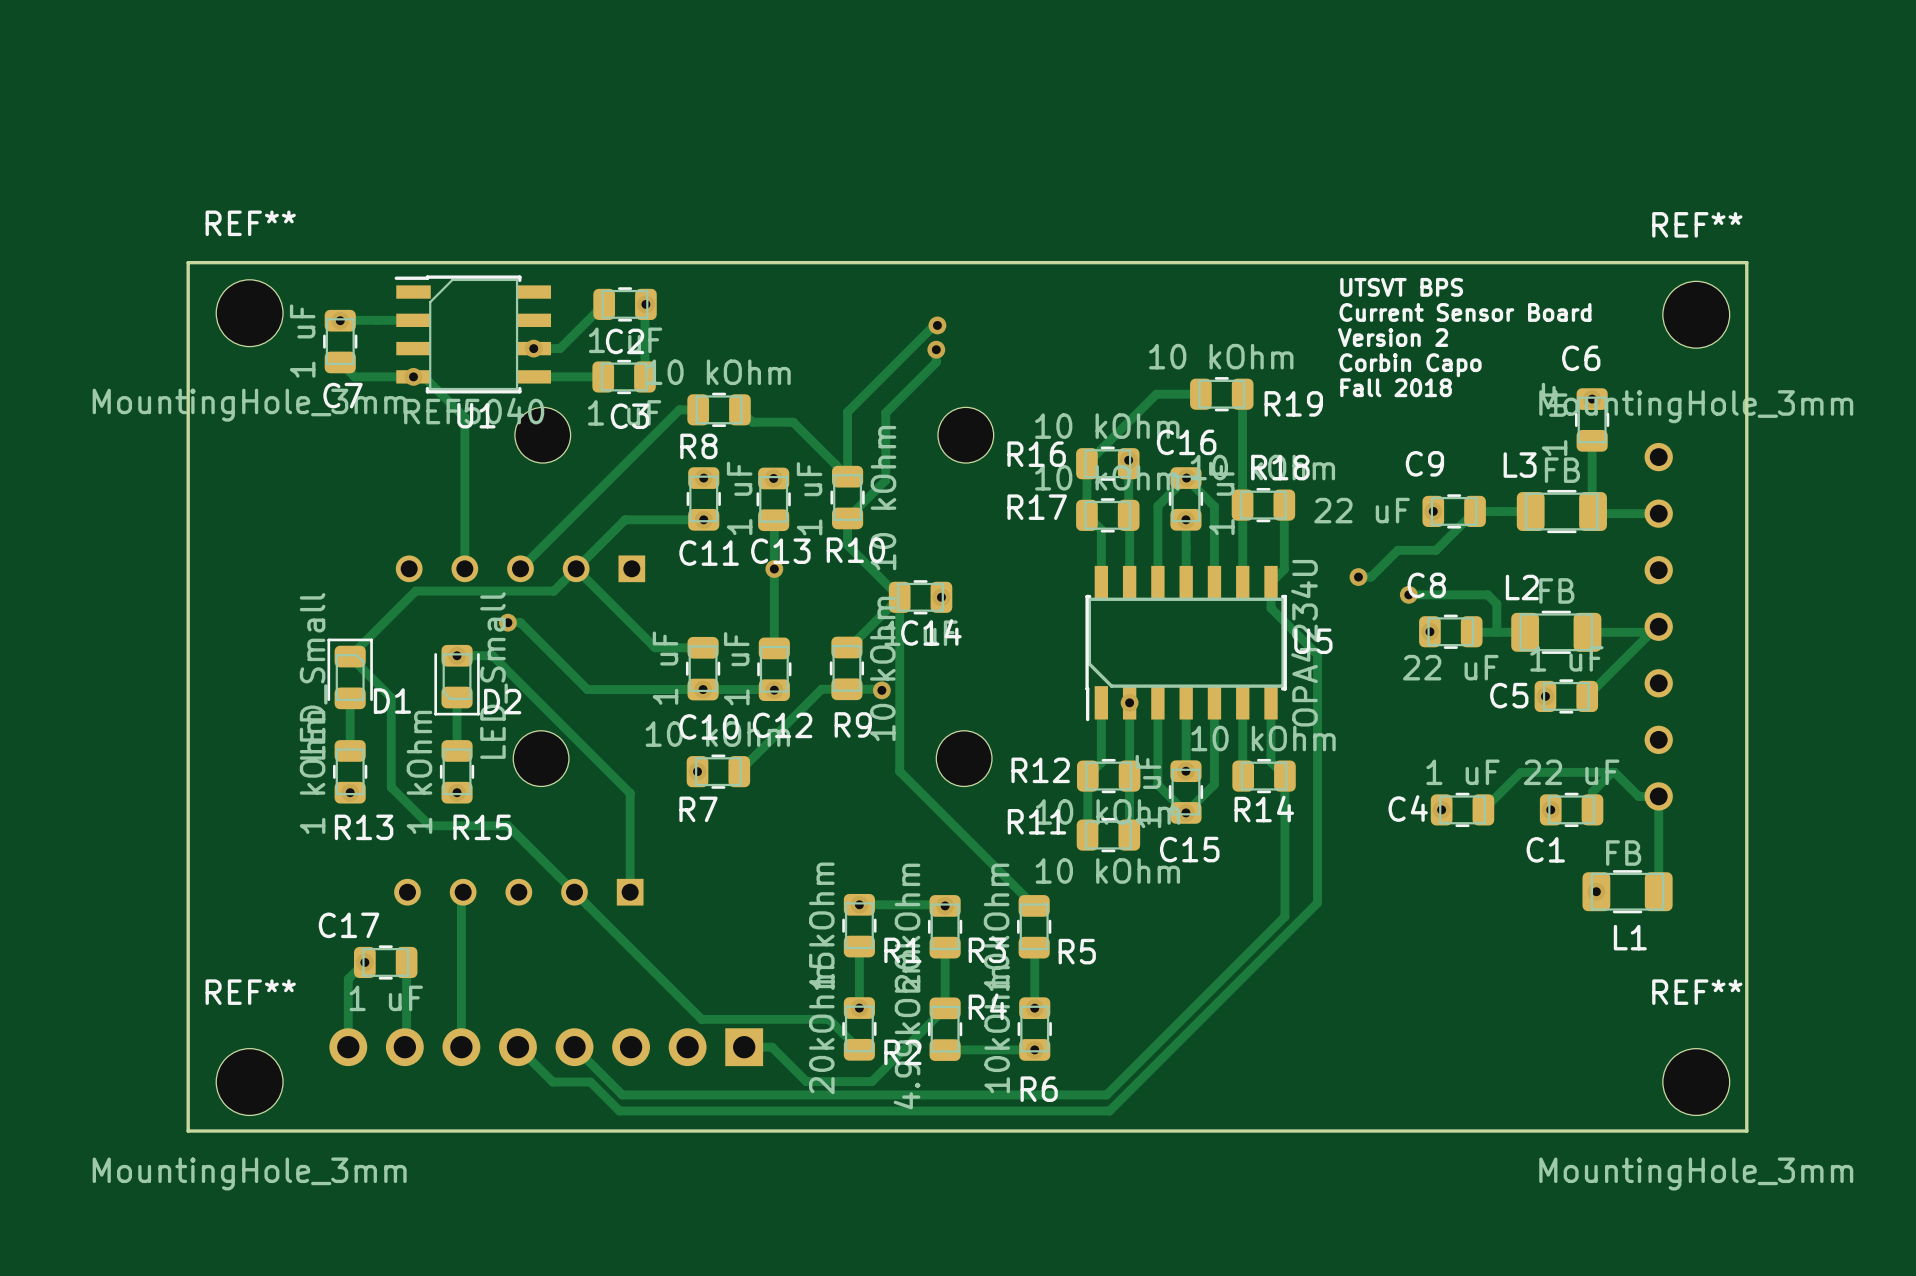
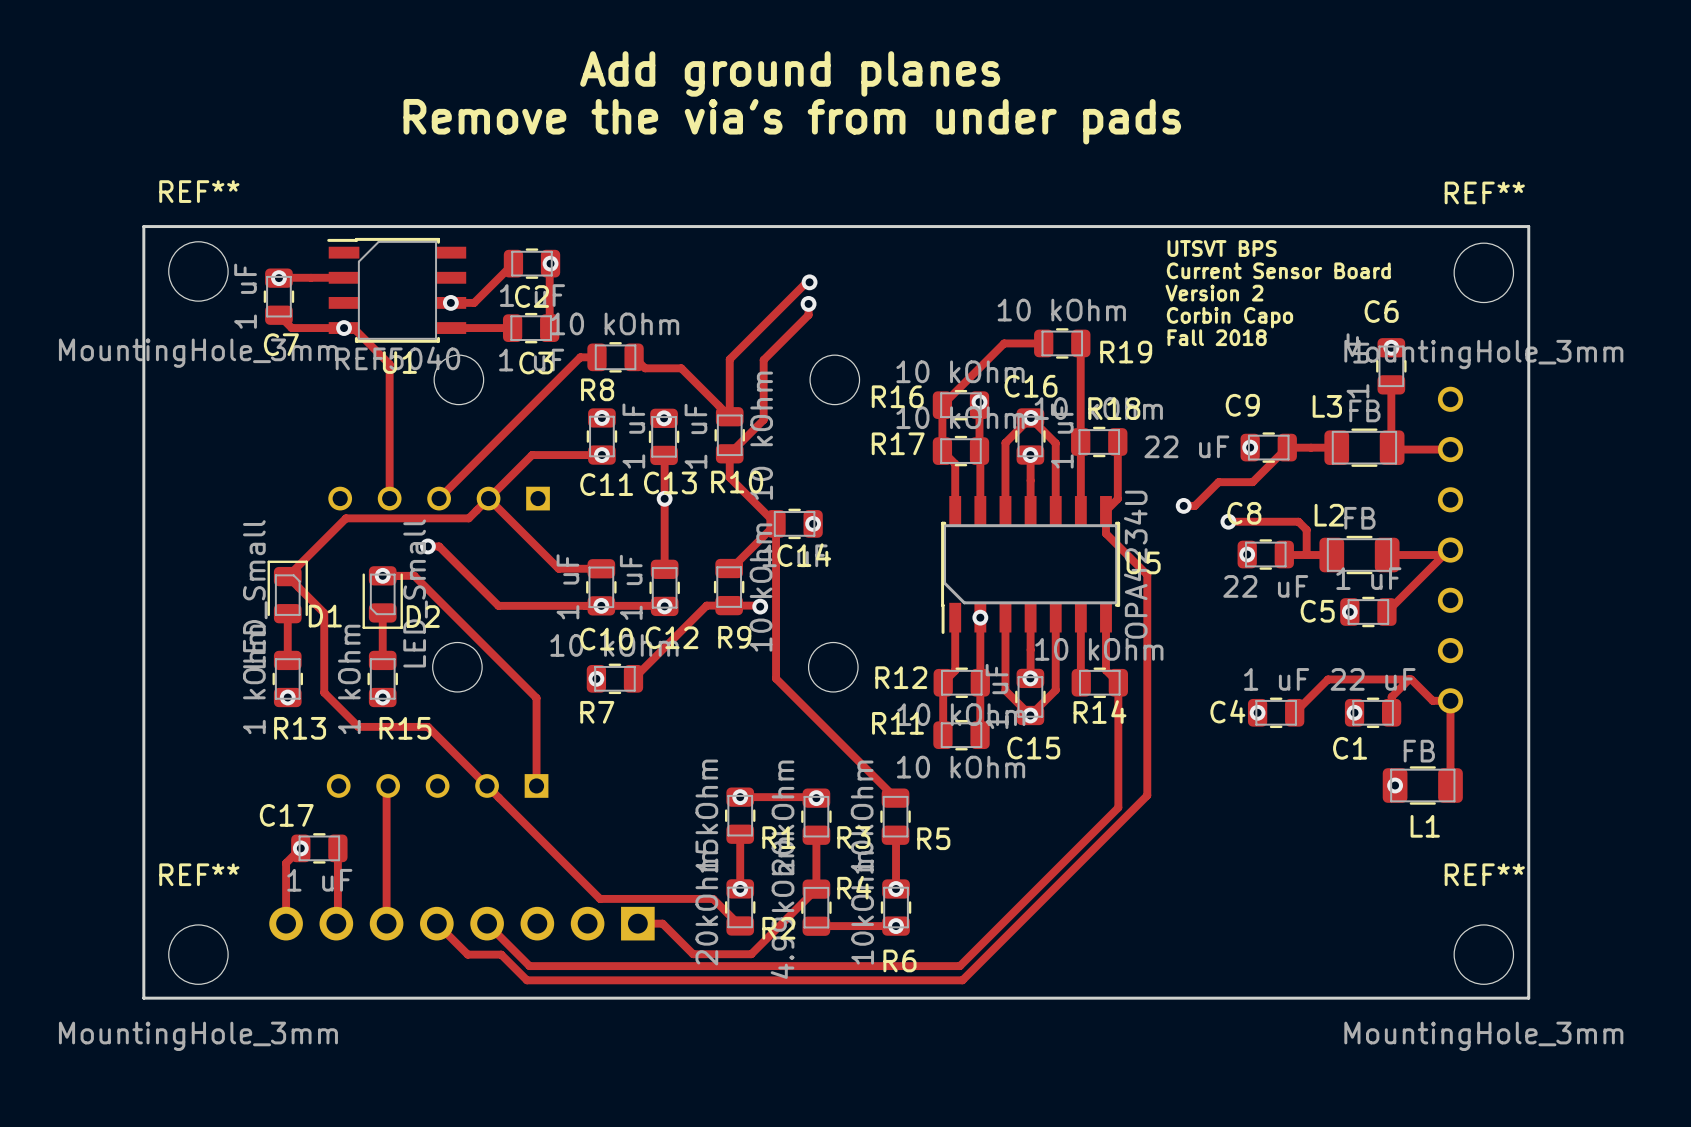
text: none -> Add ground planes (790, 73)
text: none -> Remove the via's from under pads (792, 121)

